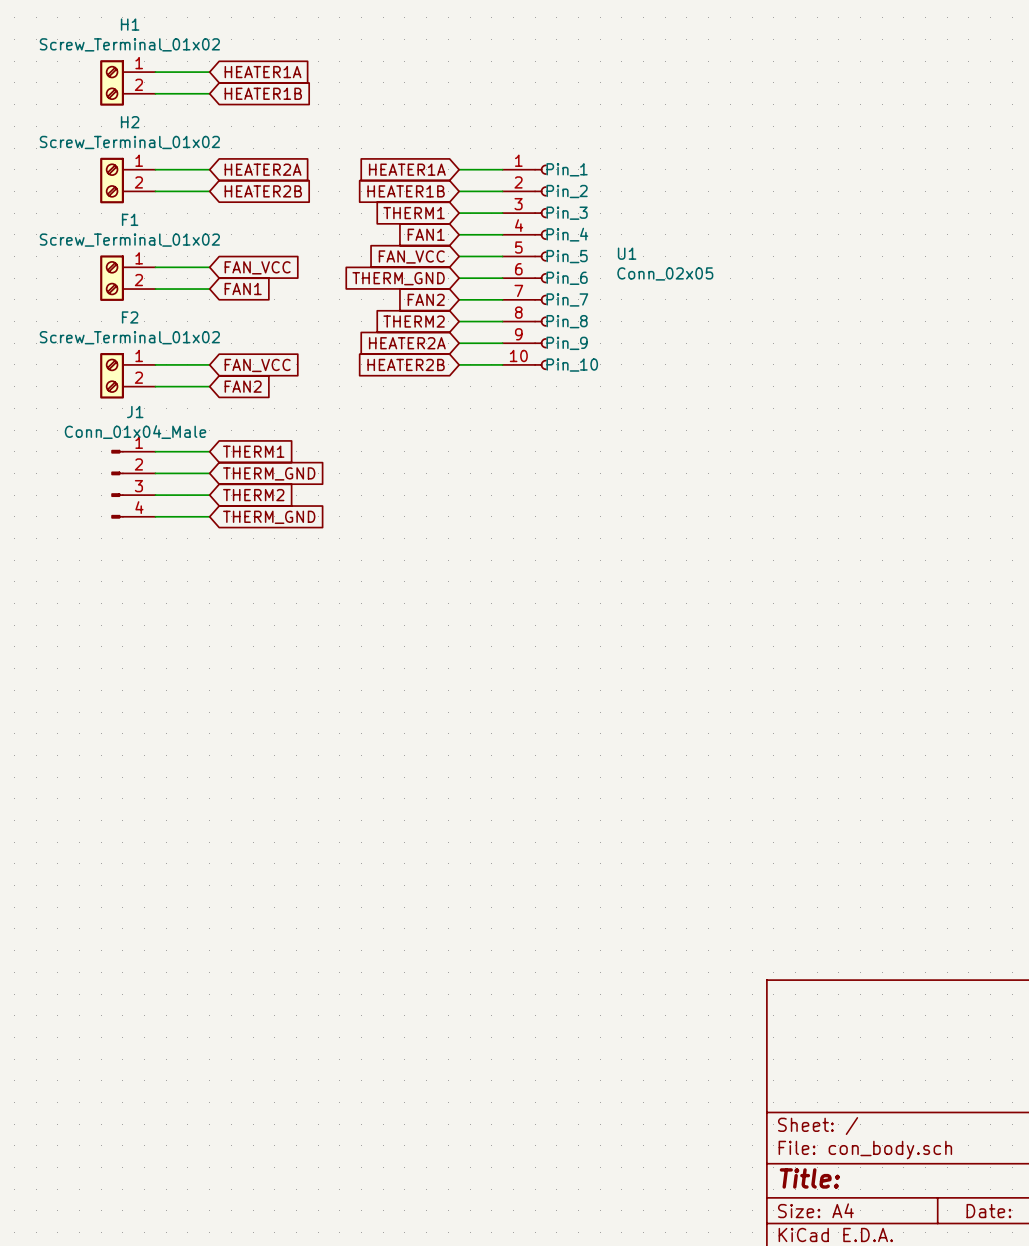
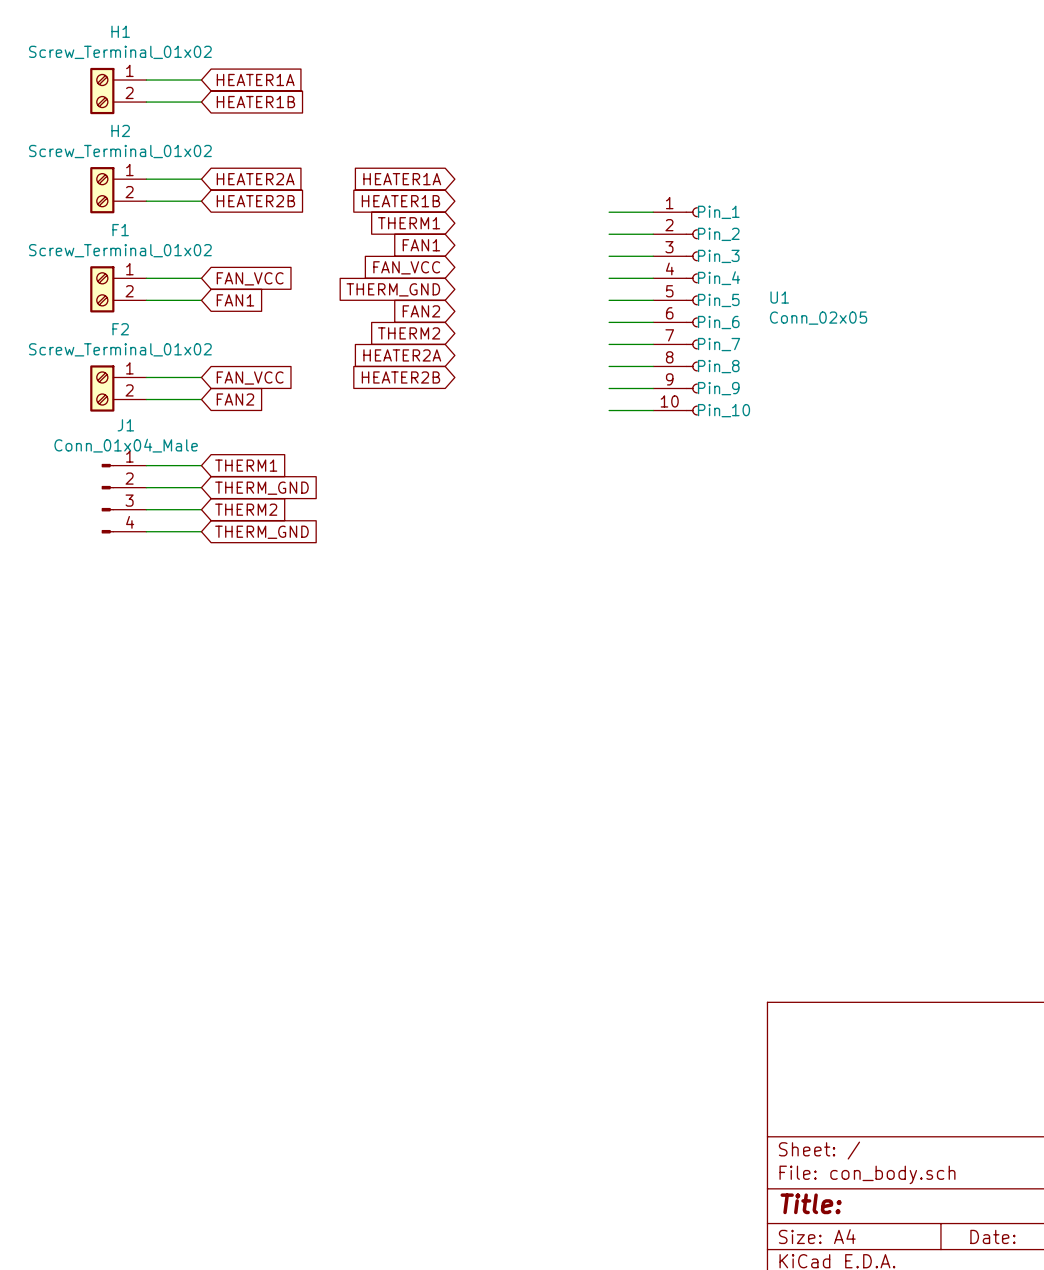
wire: (459, 169) (502, 169) -> (609, 212) (653, 212)
wire: (459, 191) (502, 191) -> (609, 234) (653, 234)
wire: (459, 213) (502, 213) -> (609, 256) (653, 256)
wire: (459, 234) (502, 234) -> (609, 278) (653, 278)
wire: (459, 256) (502, 256) -> (609, 300) (653, 300)
U1 position: (524, 267) -> (675, 311)
wire: (459, 278) (502, 278) -> (609, 322) (653, 322)
wire: (459, 299) (502, 299) -> (609, 344) (653, 344)
wire: (459, 321) (502, 321) -> (609, 366) (653, 366)
wire: (459, 343) (502, 343) -> (609, 388) (653, 388)
wire: (459, 364) (502, 364) -> (609, 410) (653, 410)

